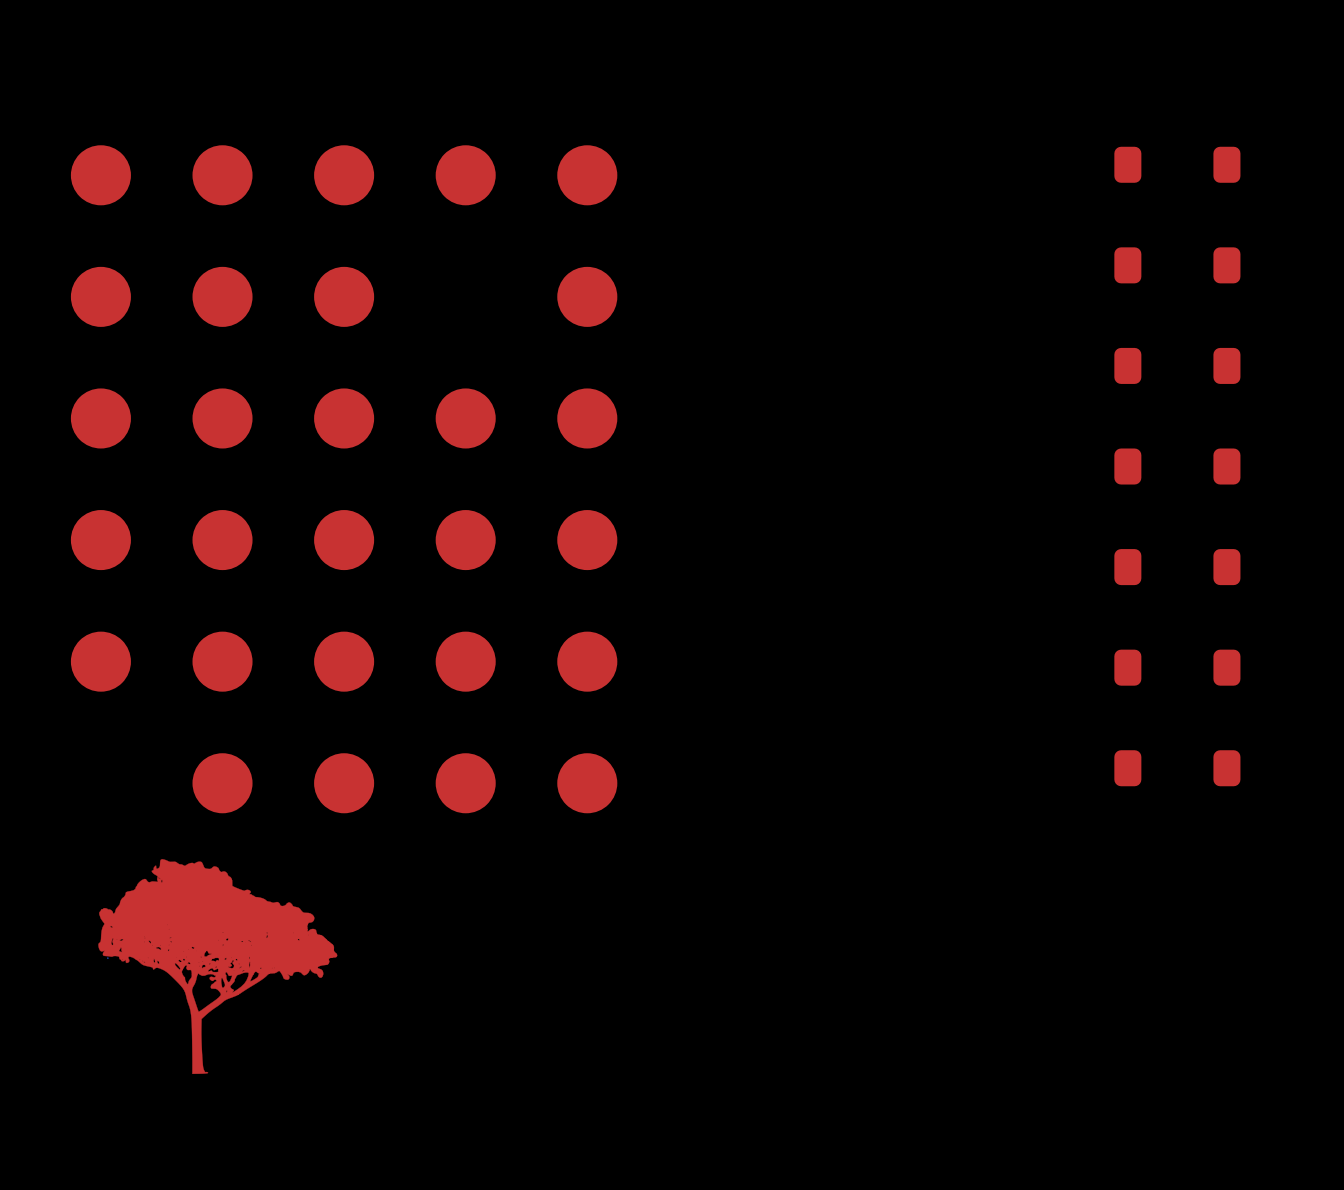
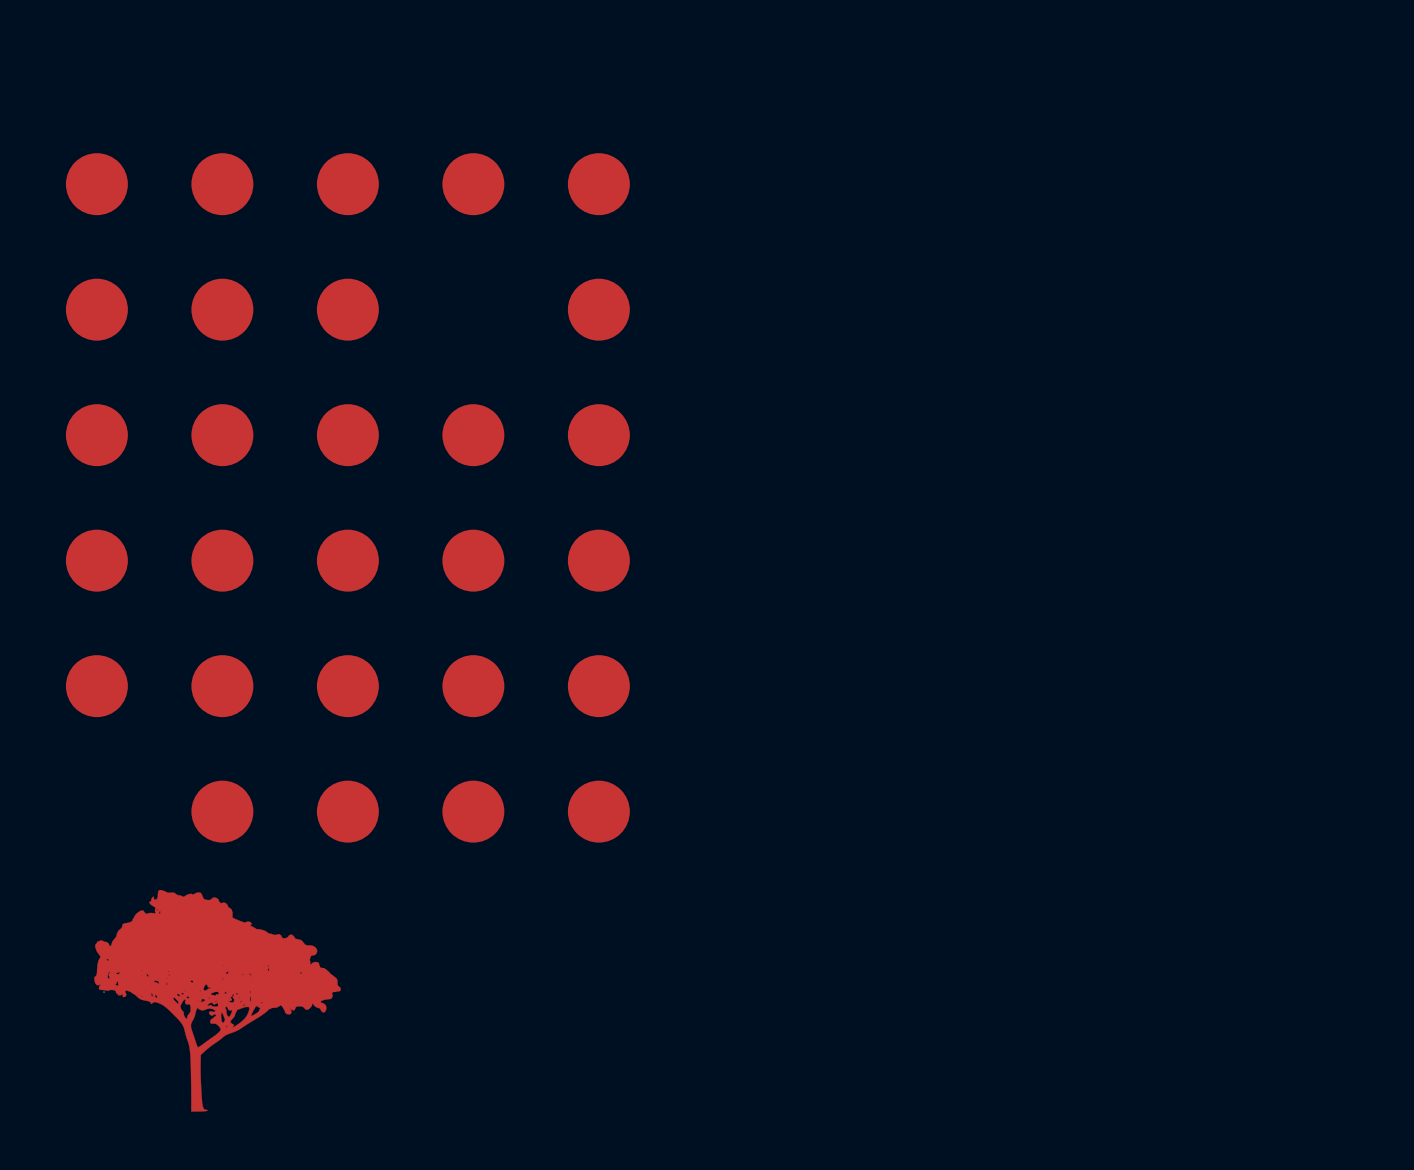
part: (1177, 164) -> none
part: (1177, 265) -> none
part: (1177, 365) -> none
part: (1177, 466) -> none
part: (1177, 567) -> none
part: (1177, 667) -> none
part: (1177, 768) -> none

